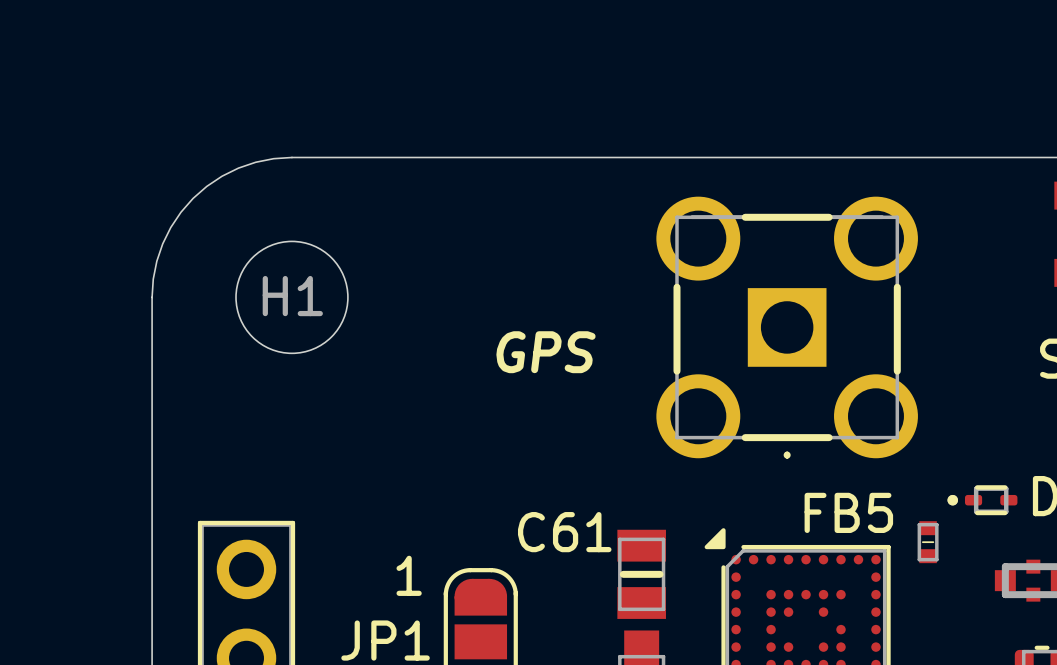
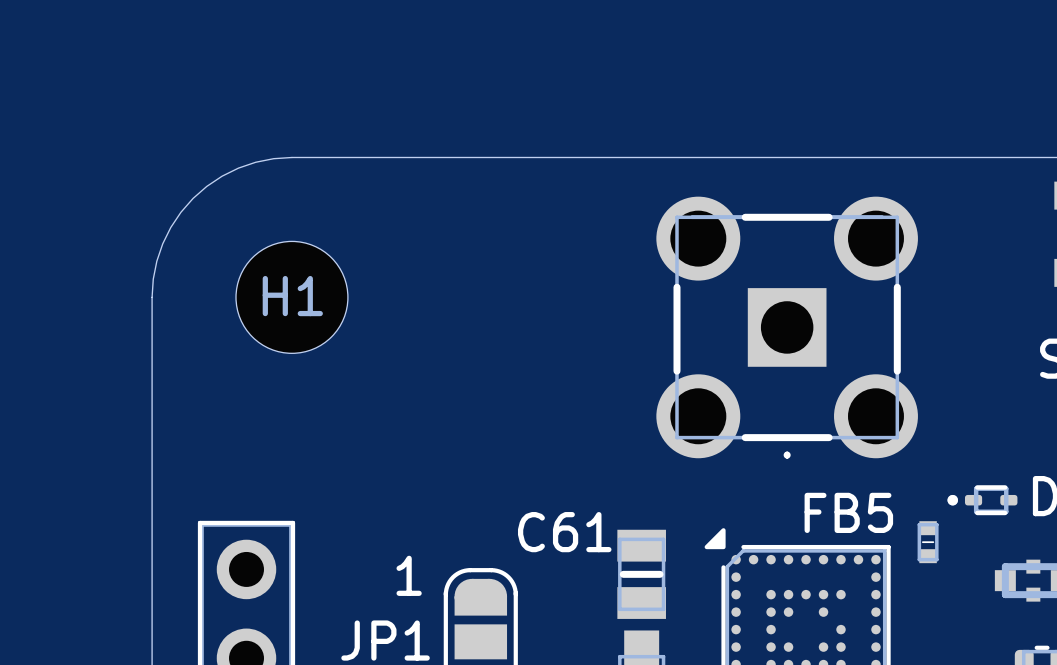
text: GPS (545, 352) -> none

